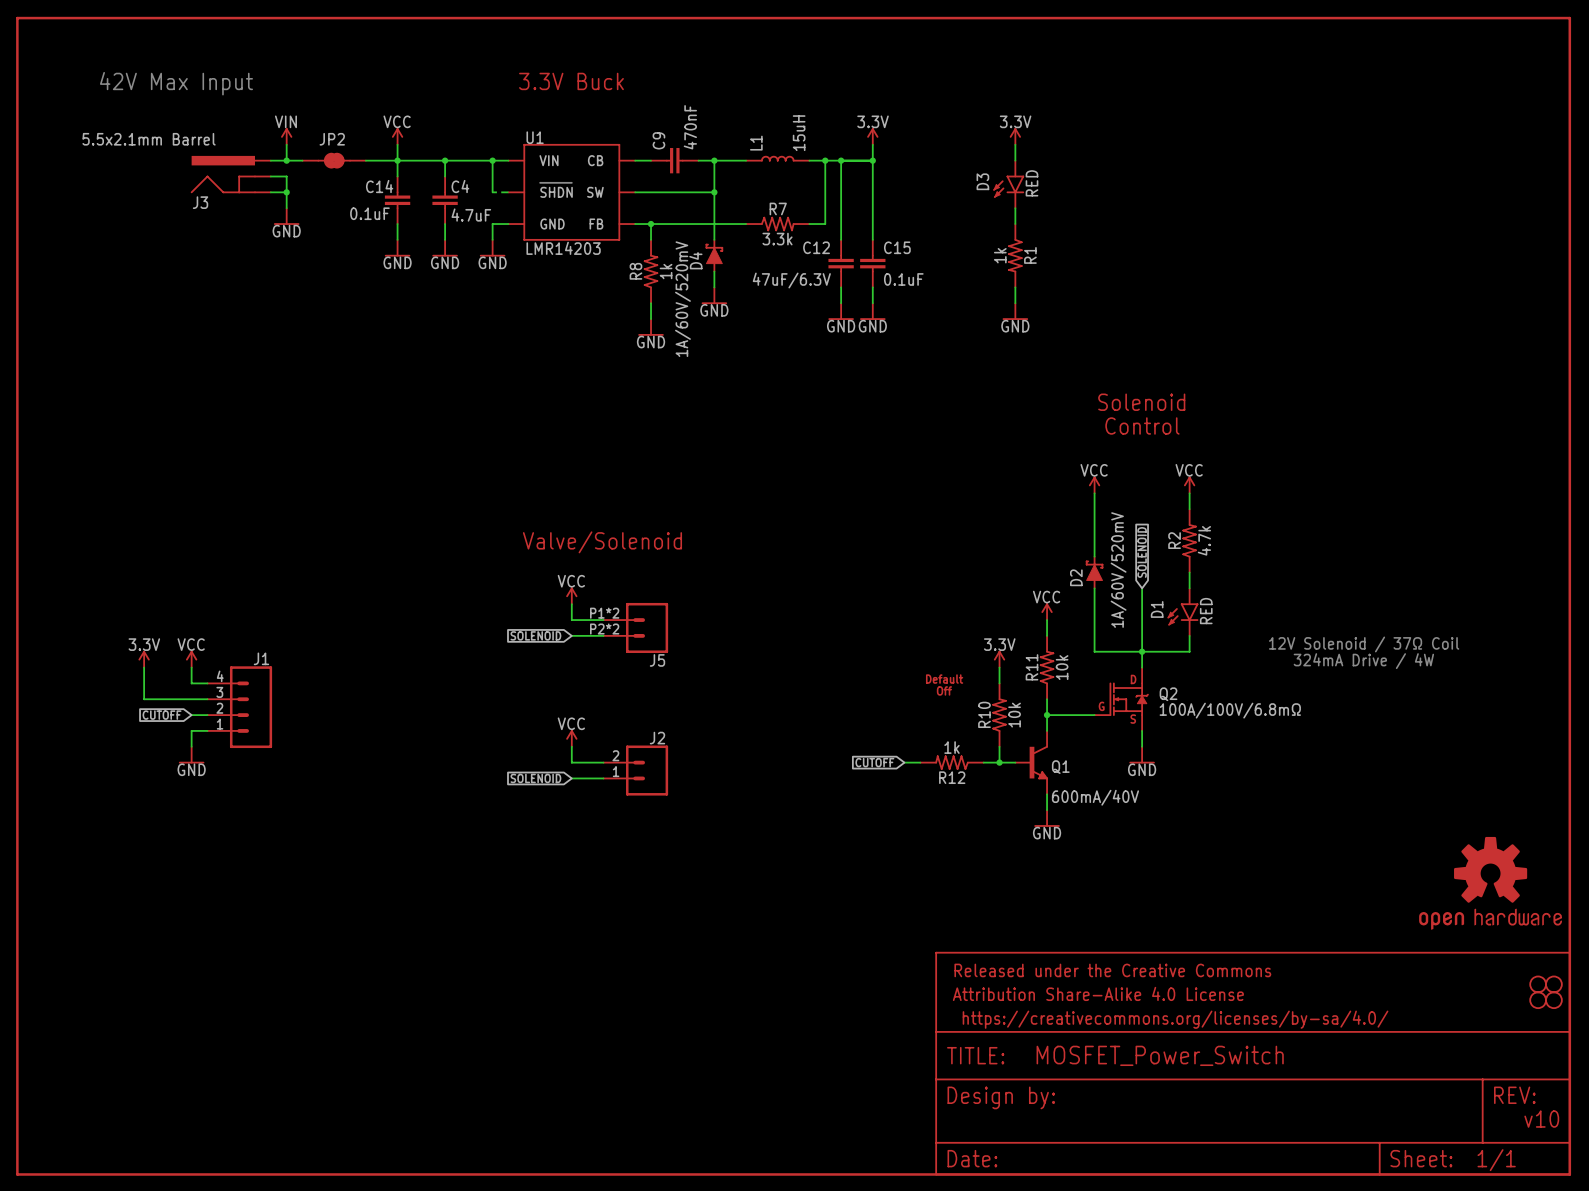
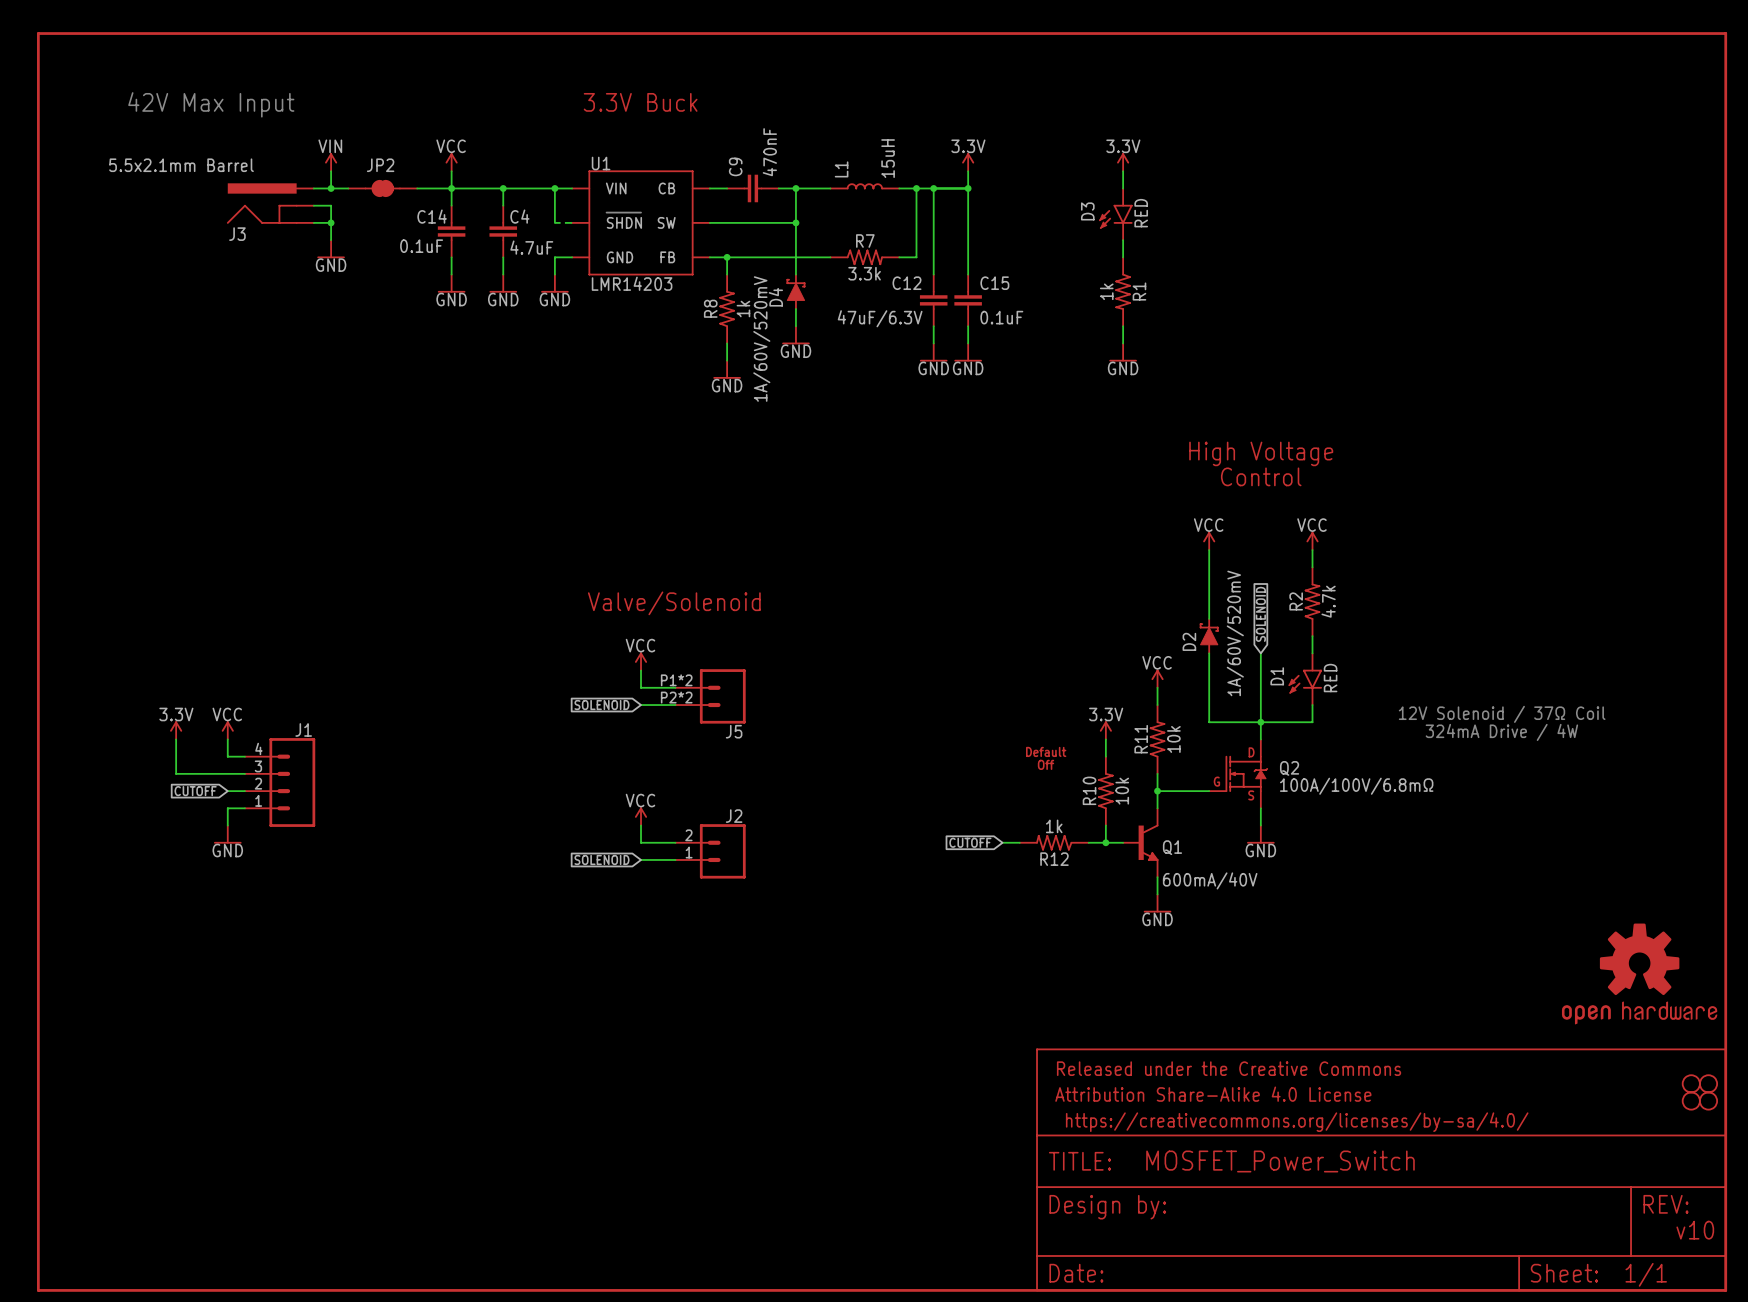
text: Solenoid (1141, 402) -> High Voltage (1261, 453)

